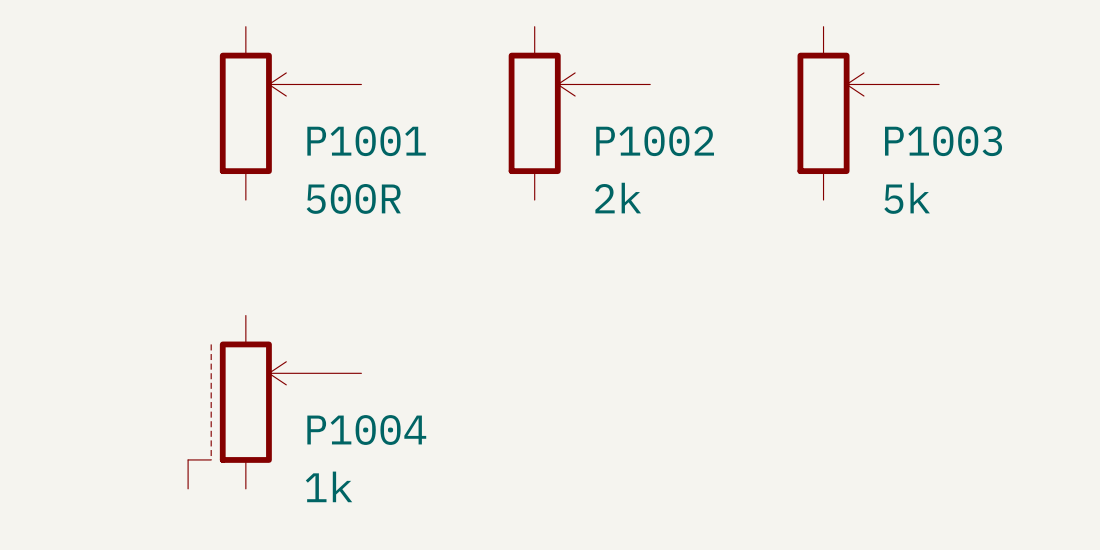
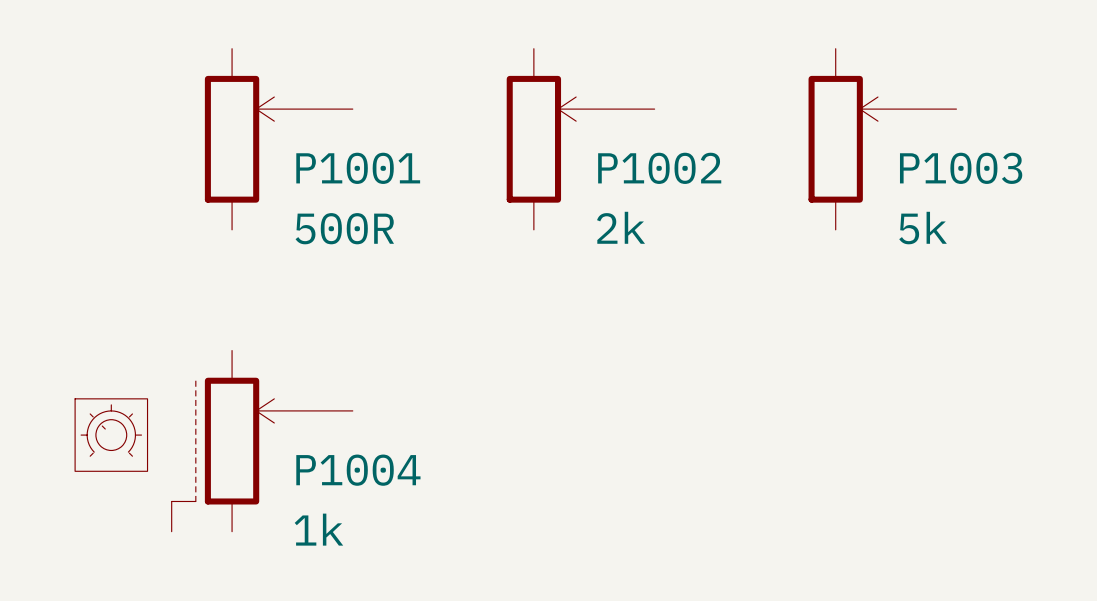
part: none -> (111, 435)

